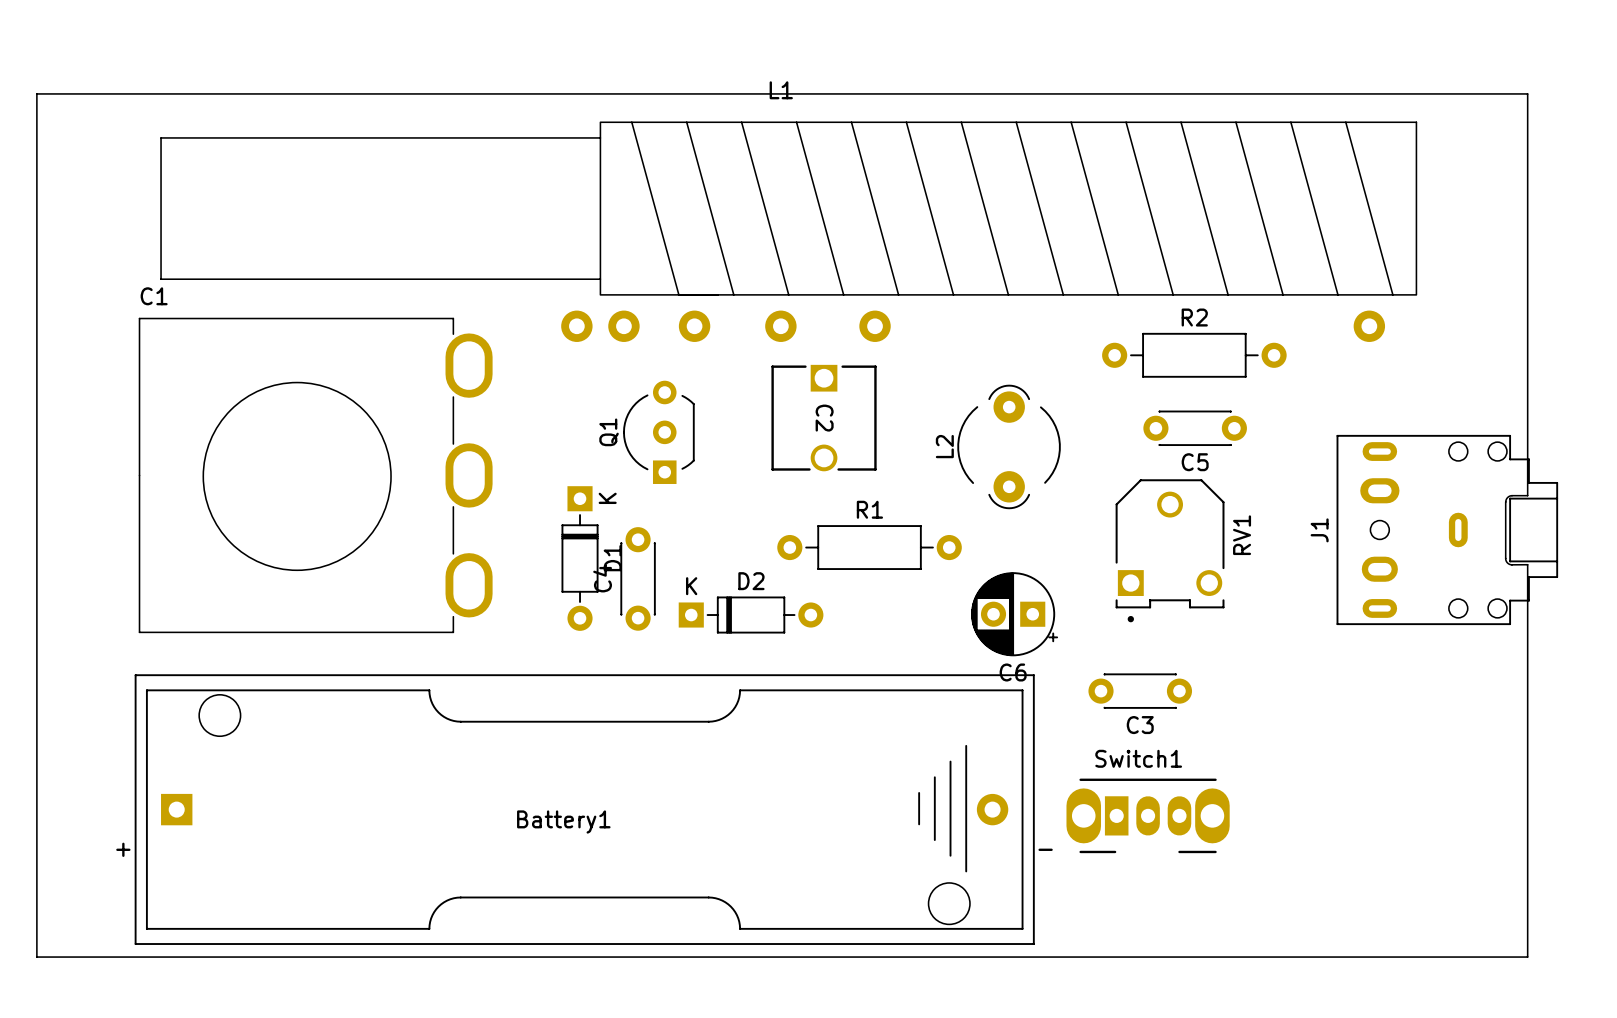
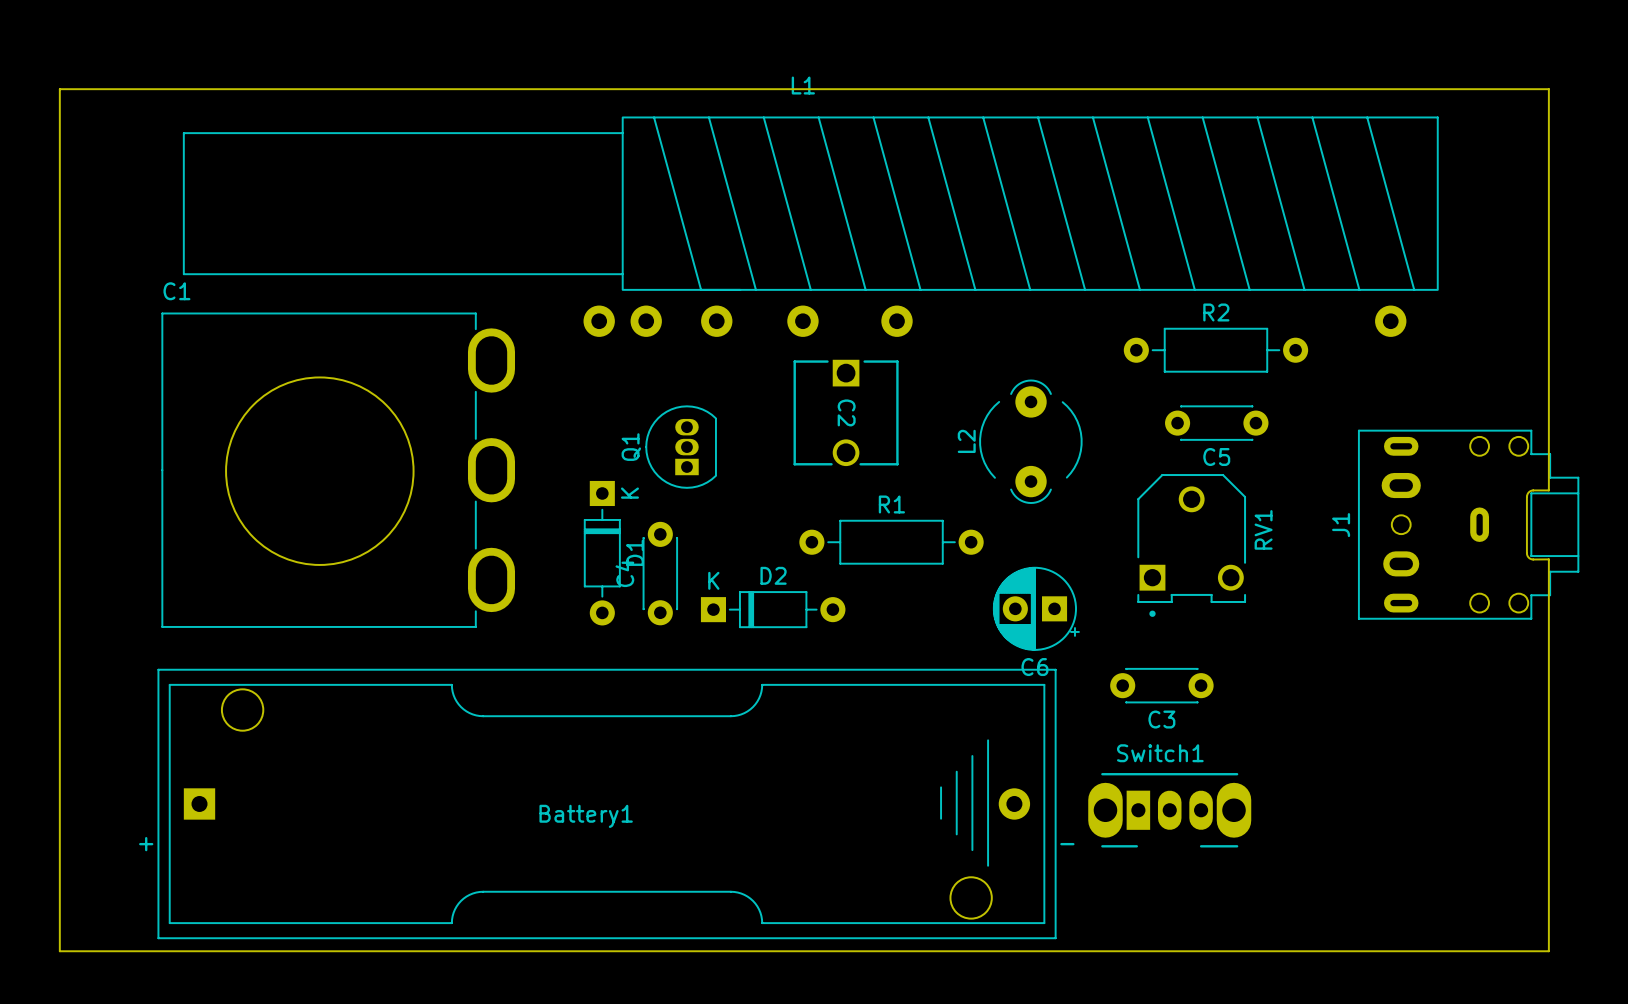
Q1 footprint: [623, 380, 695, 484] -> [645, 405, 717, 489]

